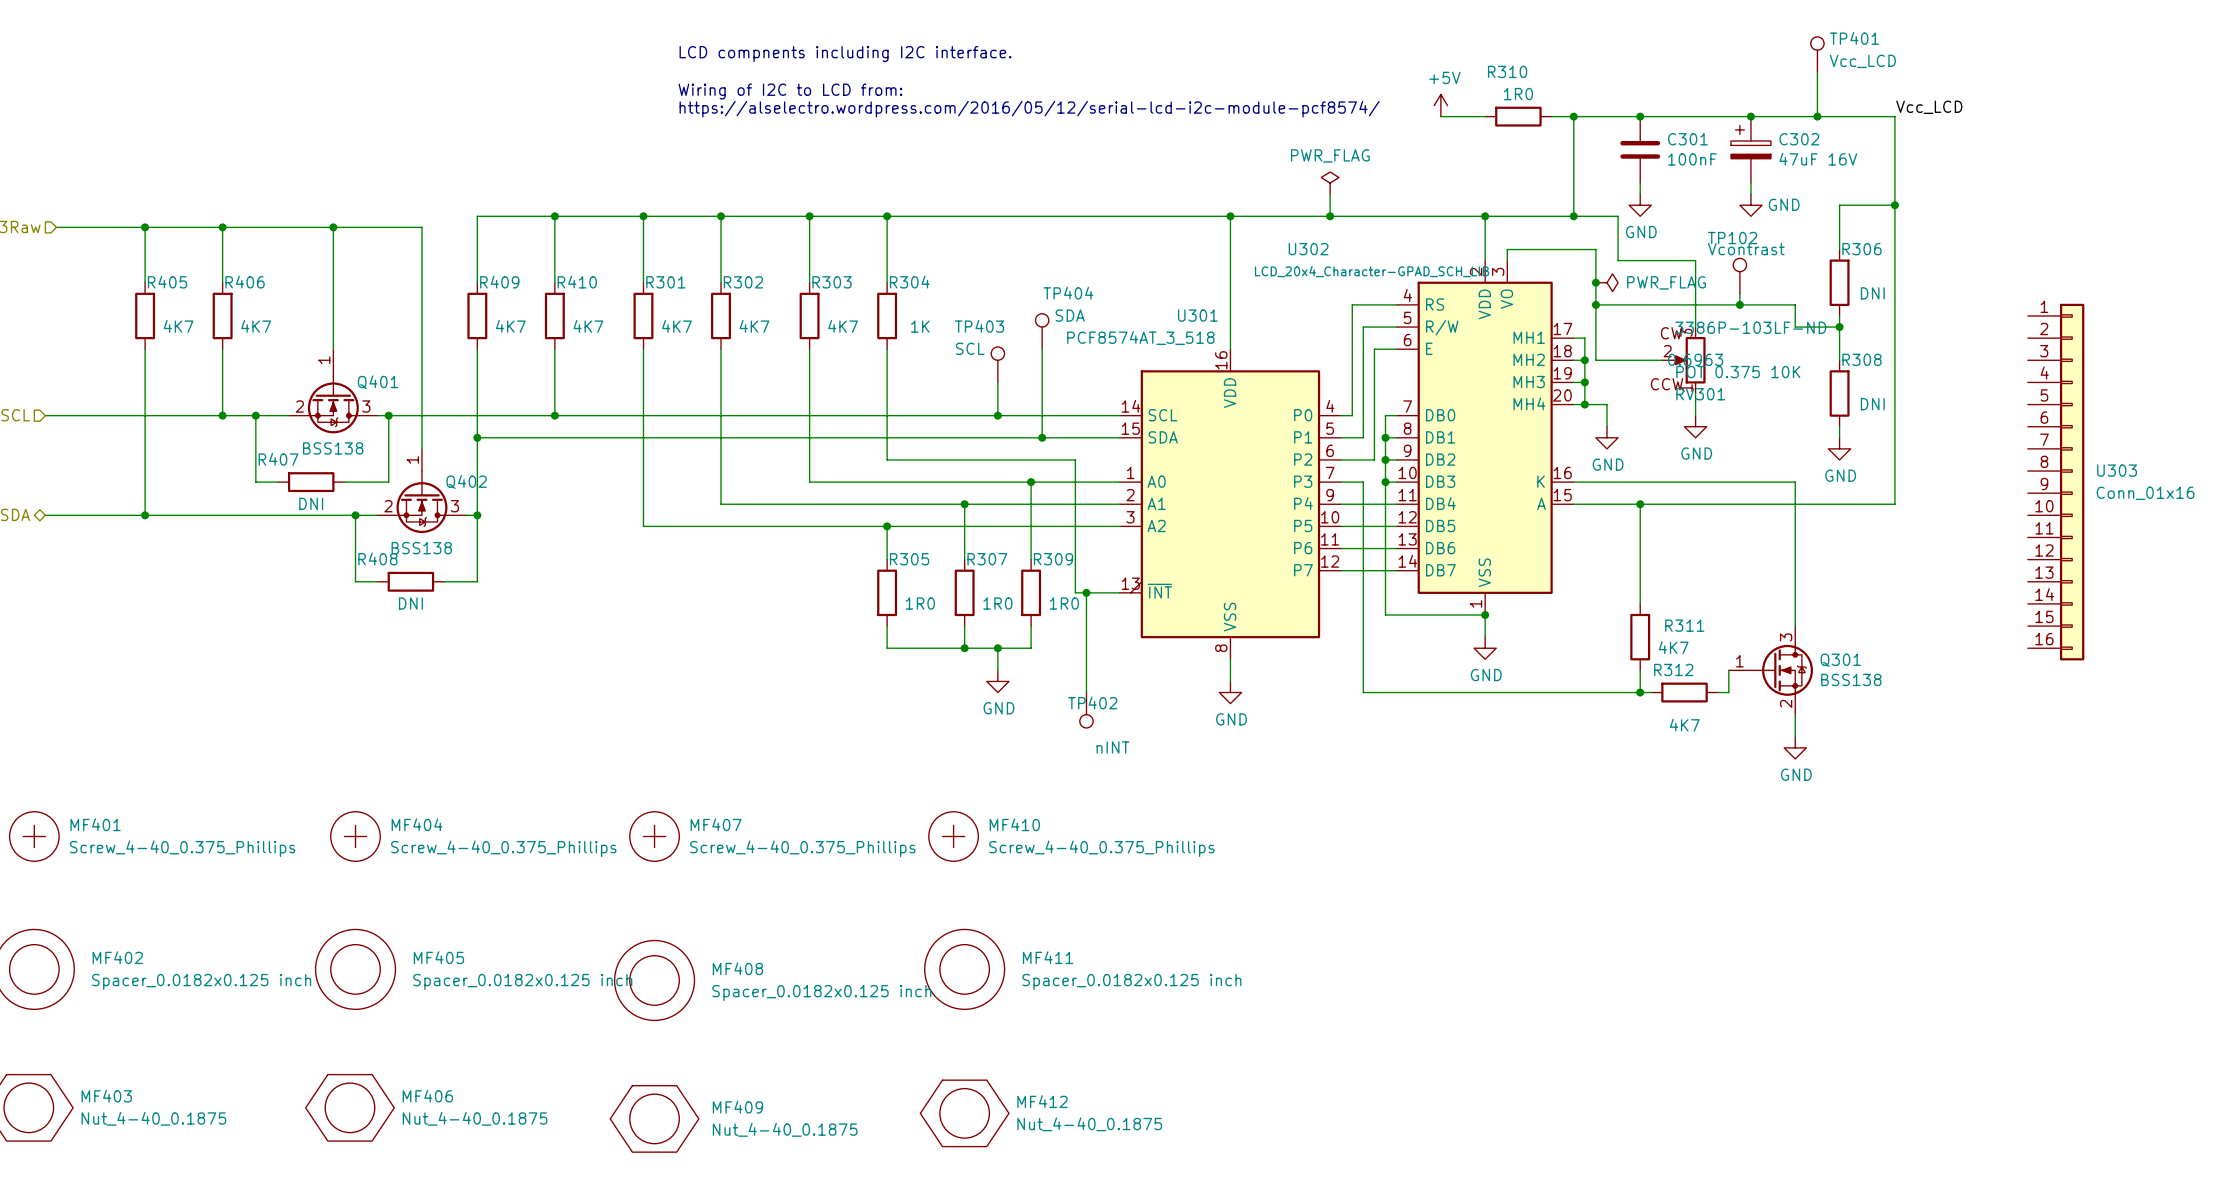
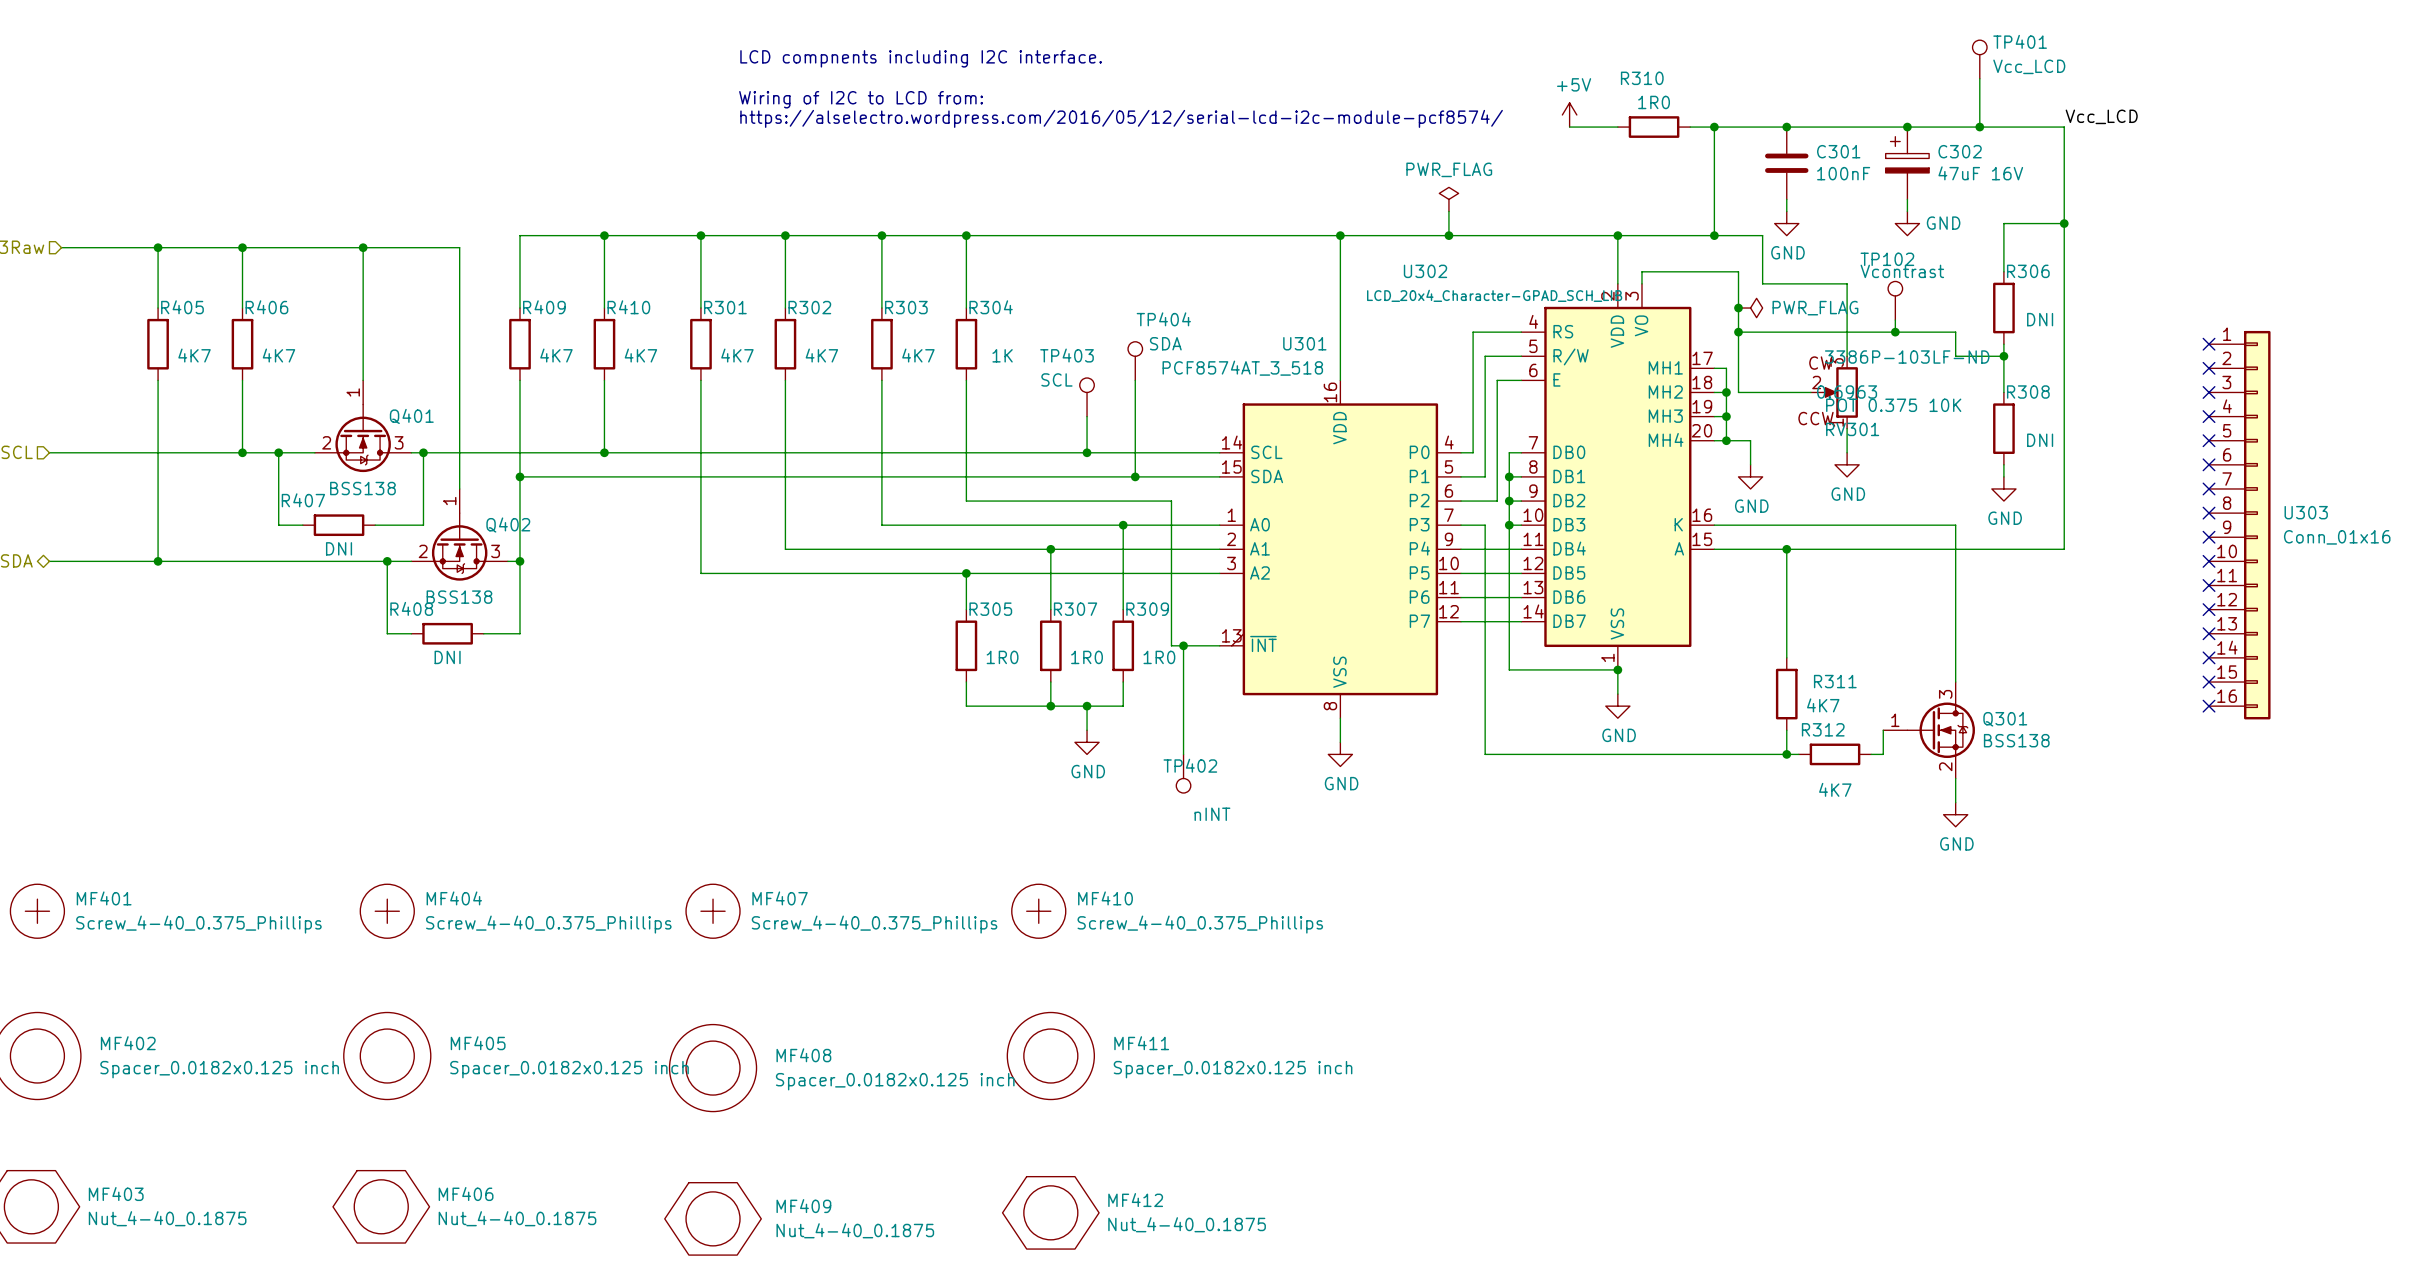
no-connect mark: none -> (2209, 344)
no-connect mark: none -> (2209, 368)
no-connect mark: none -> (2209, 392)
no-connect mark: none -> (2209, 416)
no-connect mark: none -> (2209, 440)
no-connect mark: none -> (2209, 464)
no-connect mark: none -> (2209, 488)
no-connect mark: none -> (2209, 513)
no-connect mark: none -> (2209, 537)
no-connect mark: none -> (2209, 561)
no-connect mark: none -> (2209, 585)
no-connect mark: none -> (2209, 609)
no-connect mark: none -> (2209, 633)
no-connect mark: none -> (2209, 657)
no-connect mark: none -> (2209, 682)
no-connect mark: none -> (2209, 706)

